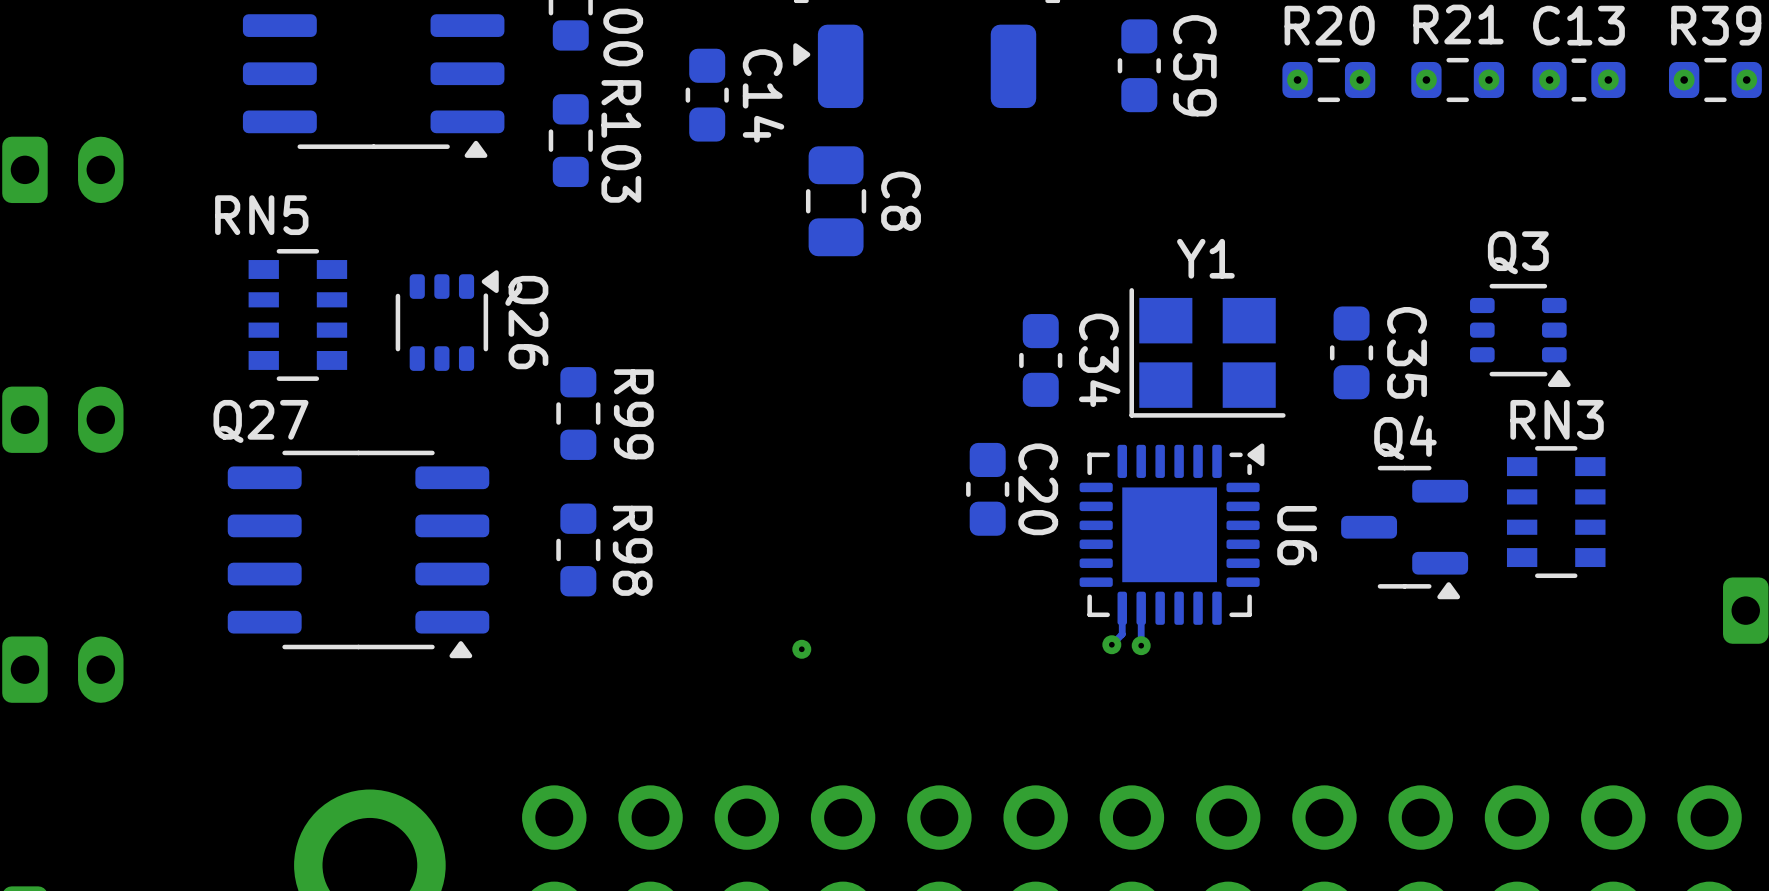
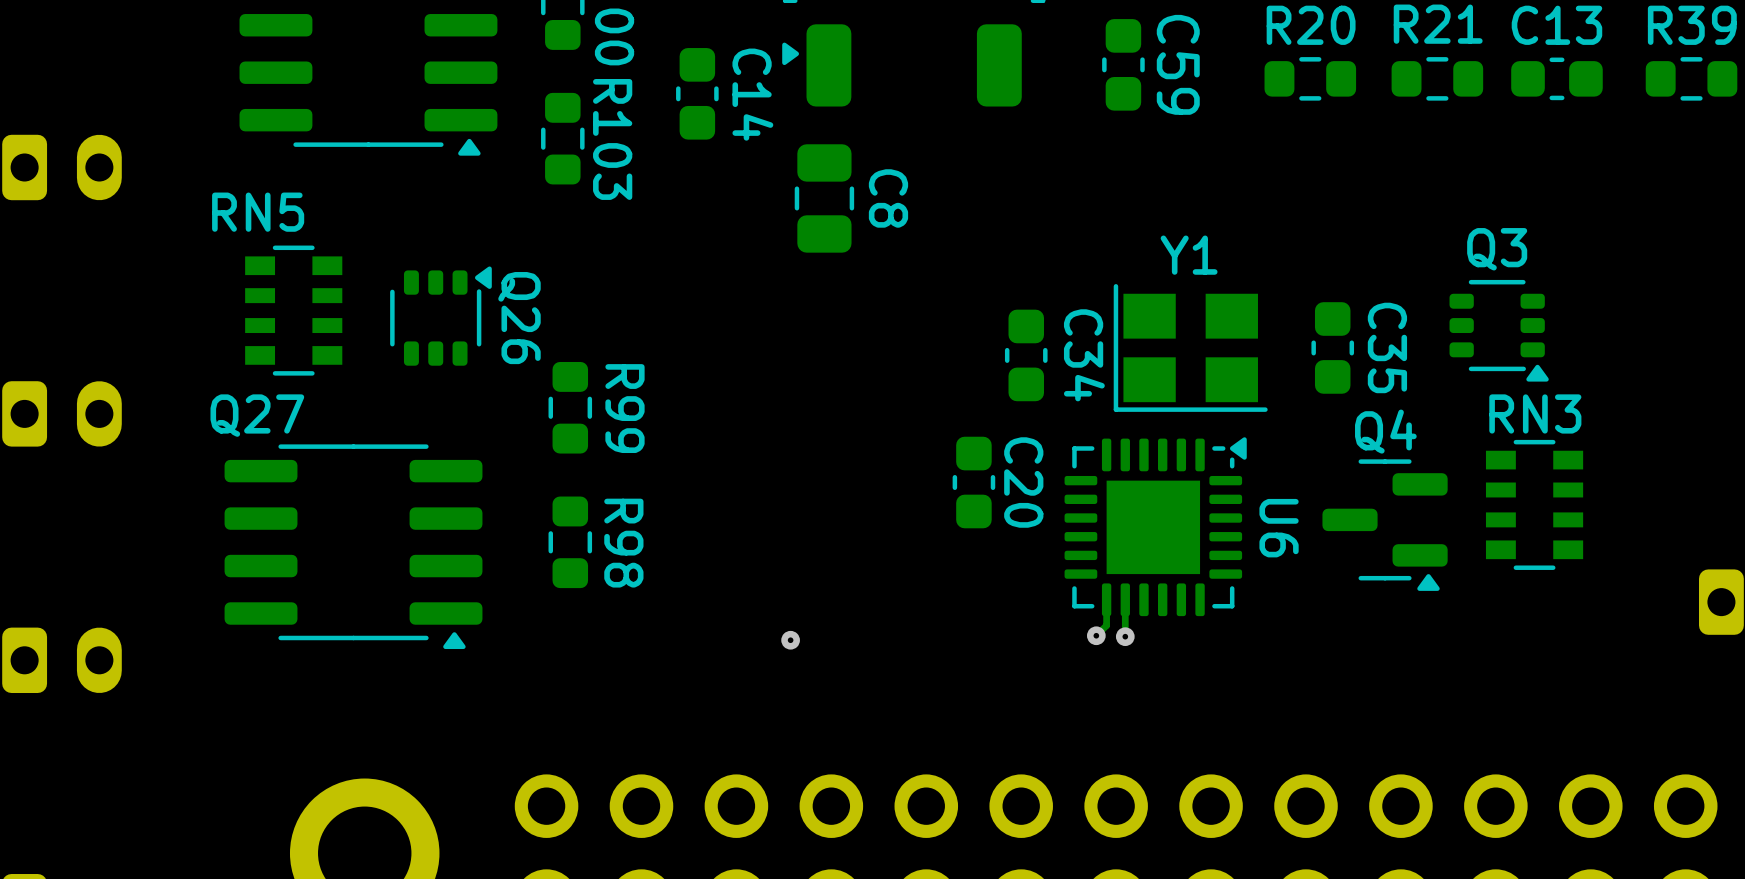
via: (1297, 79) -> none
via: (1360, 79) -> none
via: (1426, 79) -> none
via: (1488, 79) -> none
via: (1549, 79) -> none
via: (1608, 79) -> none
via: (1684, 79) -> none
via: (1746, 79) -> none

